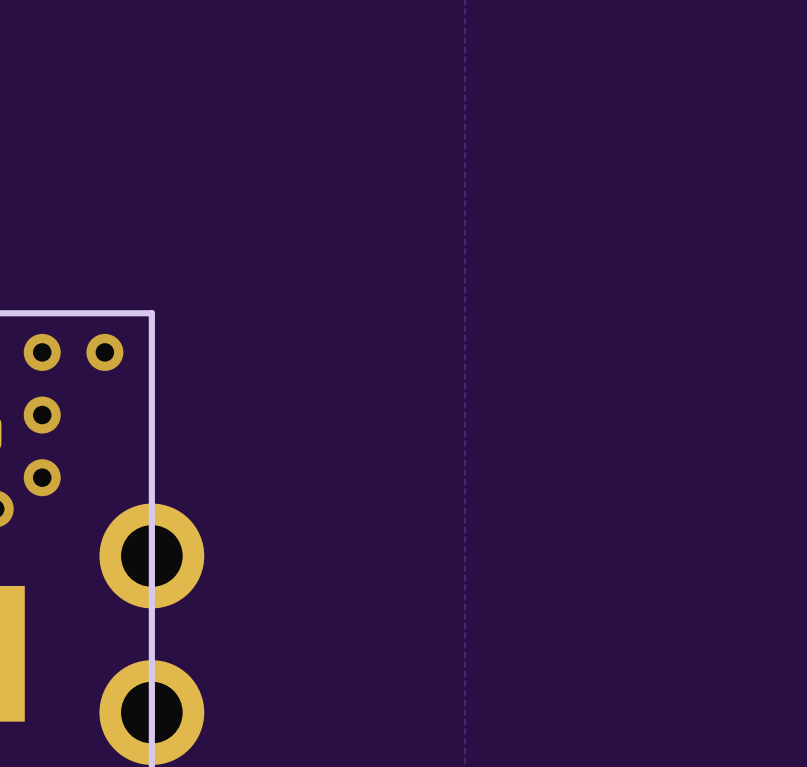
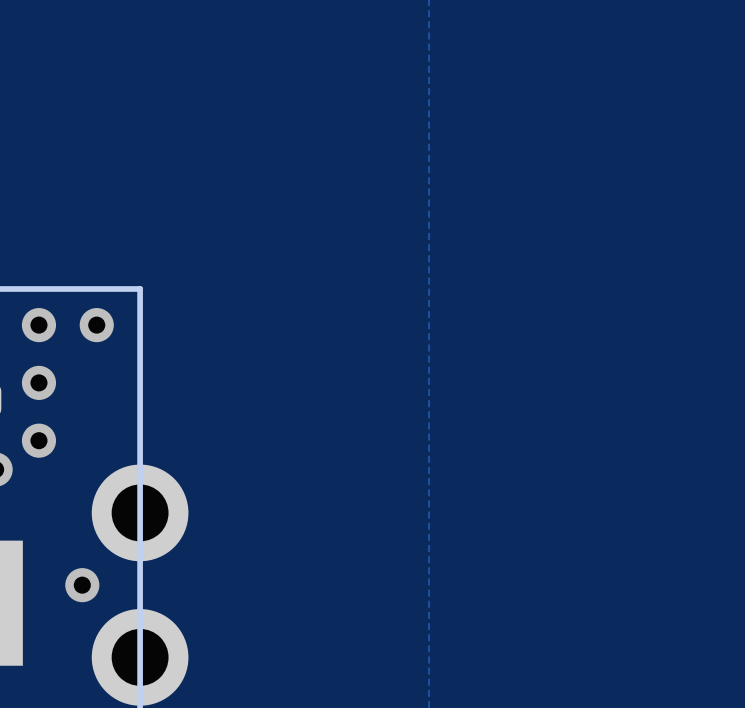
via: none -> (82, 585)

